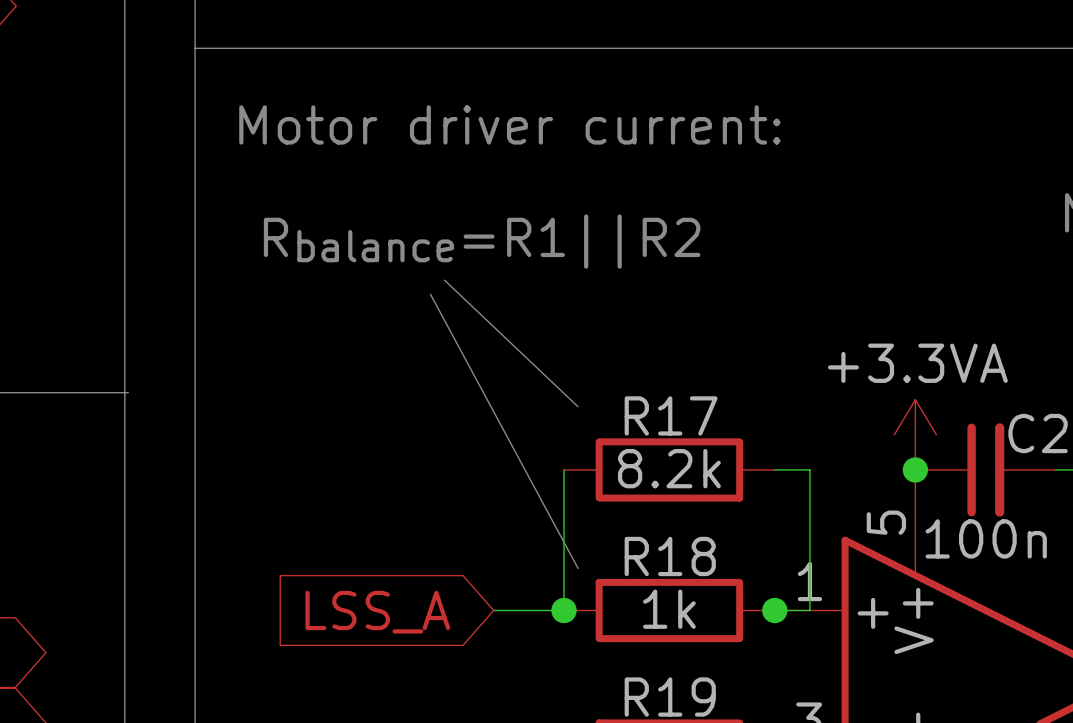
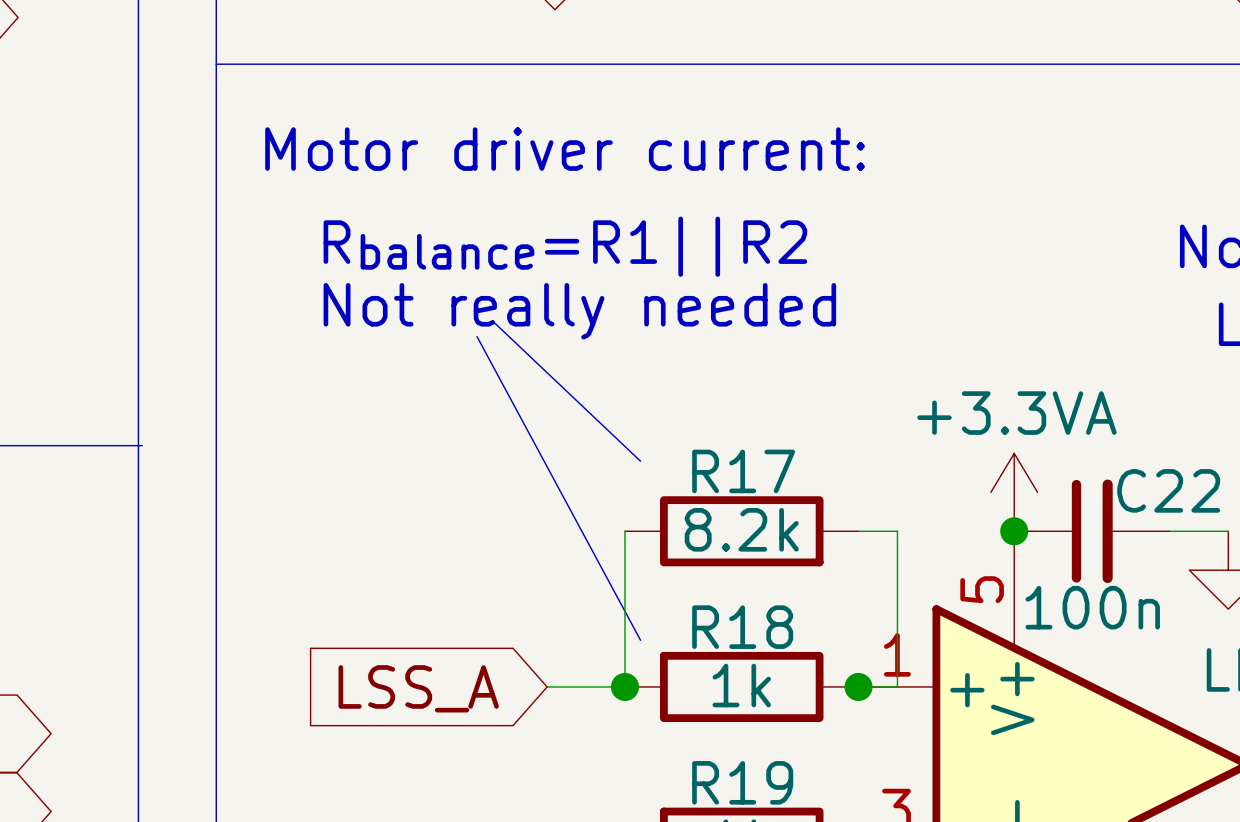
text position: Rbalance=R1||R2 (482, 241) -> Rbalance=R1||R2 (565, 246)
text: none -> Not really needed (579, 311)

